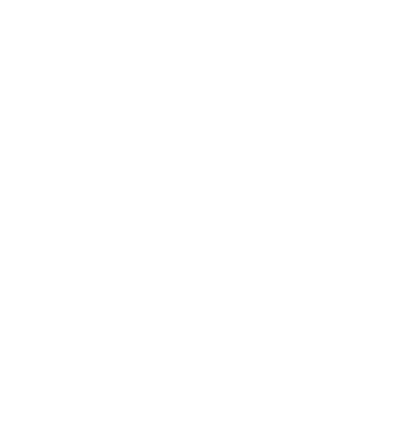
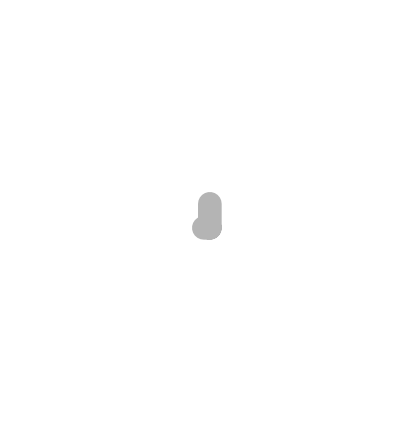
track: none -> (209, 203) (209, 227) (203, 227)

